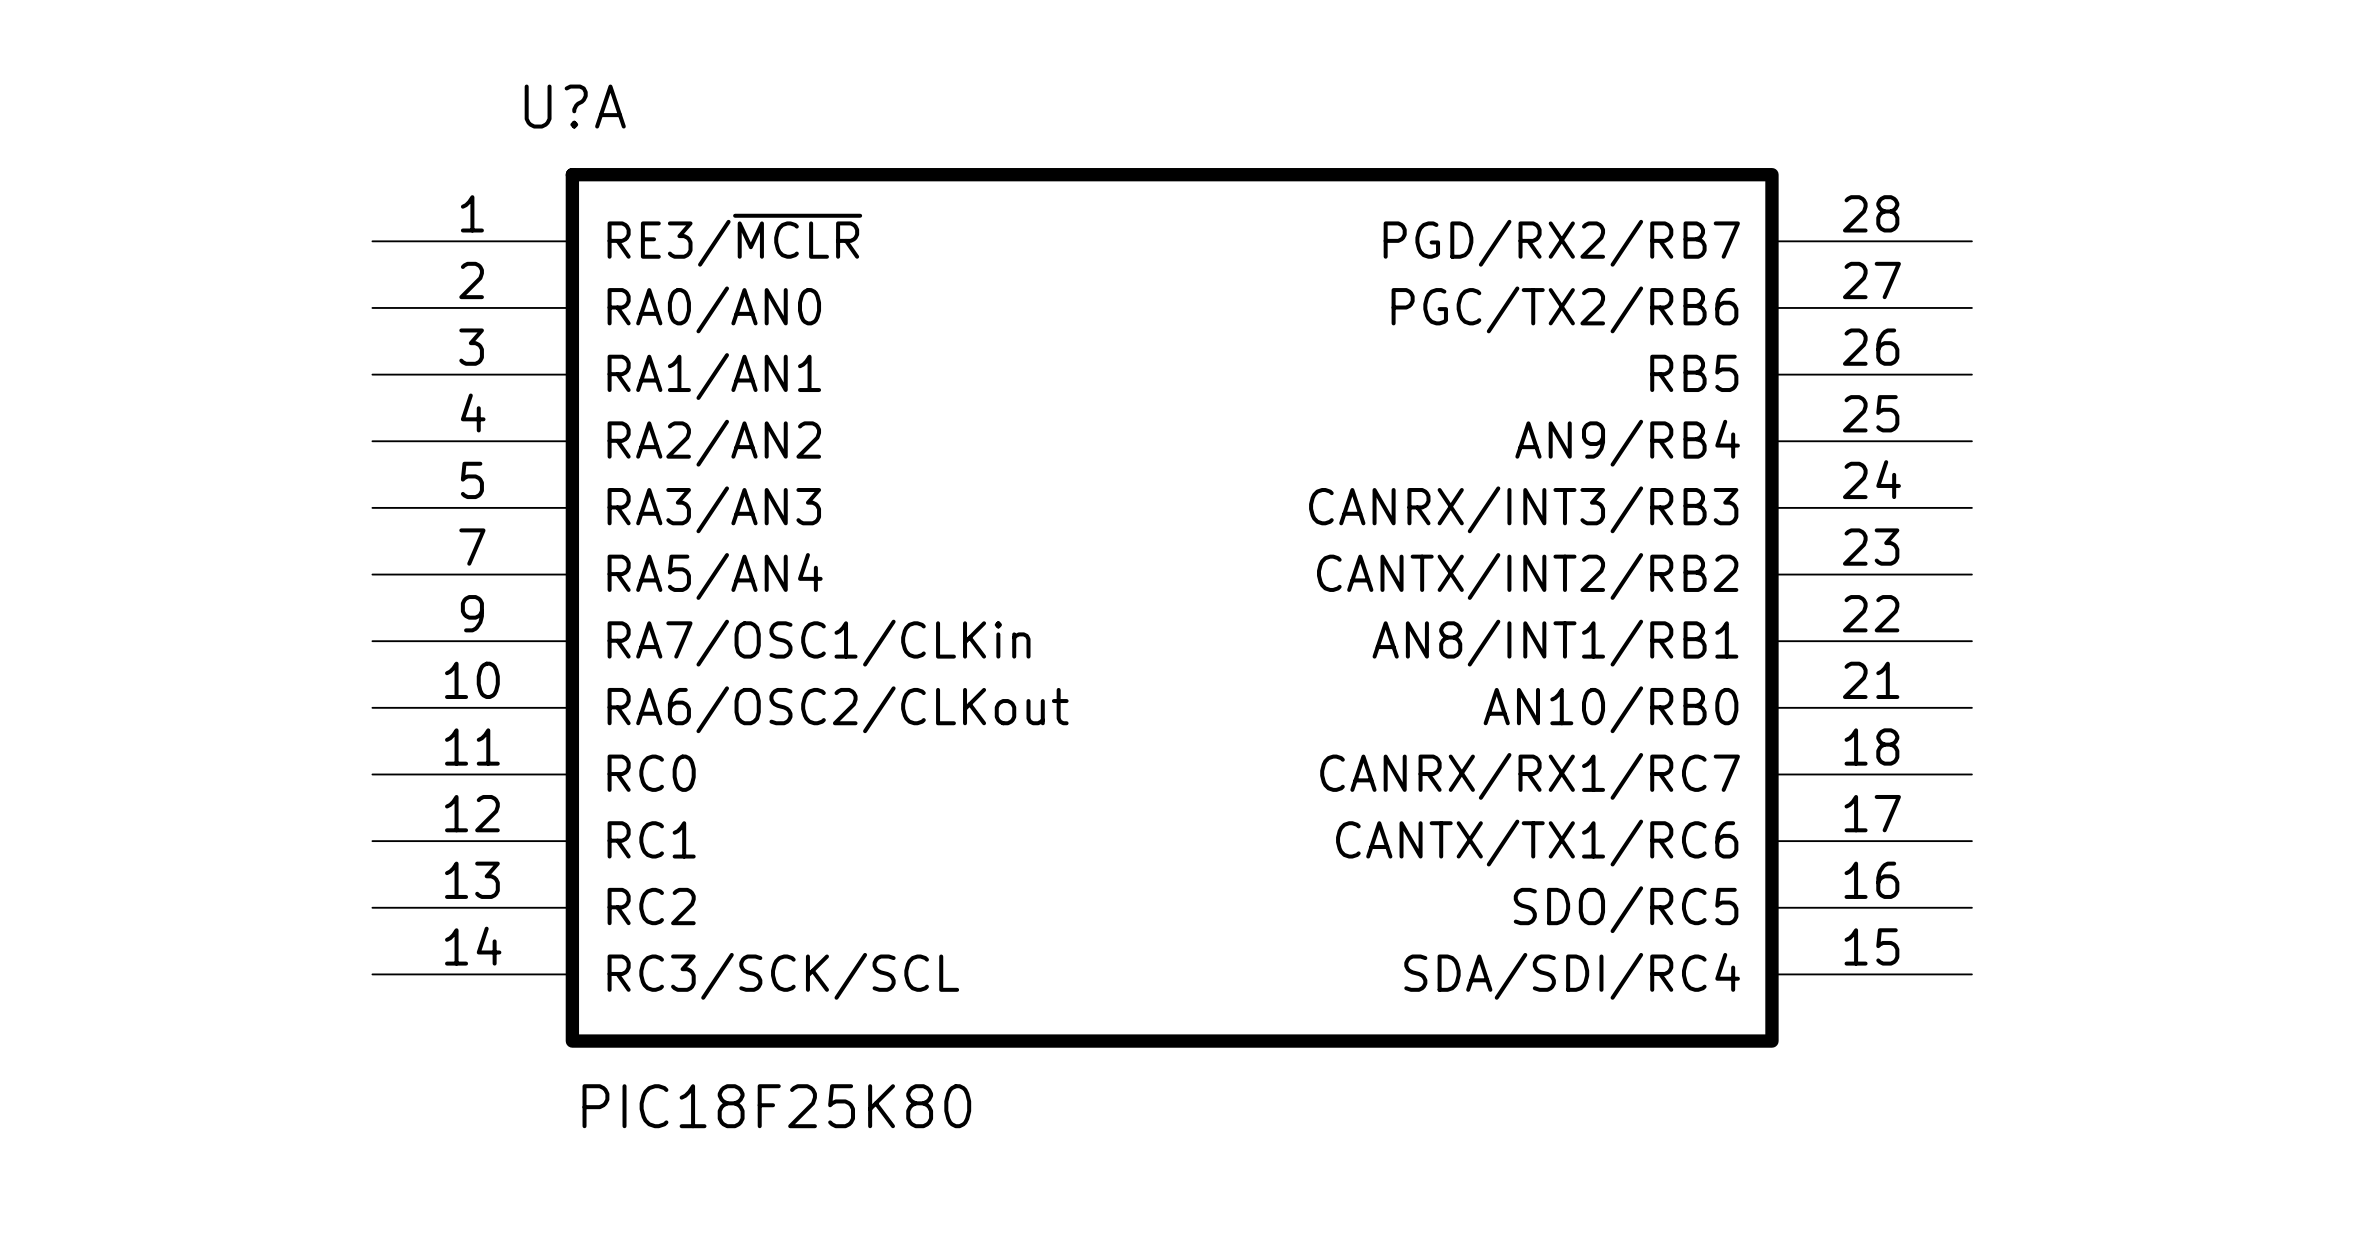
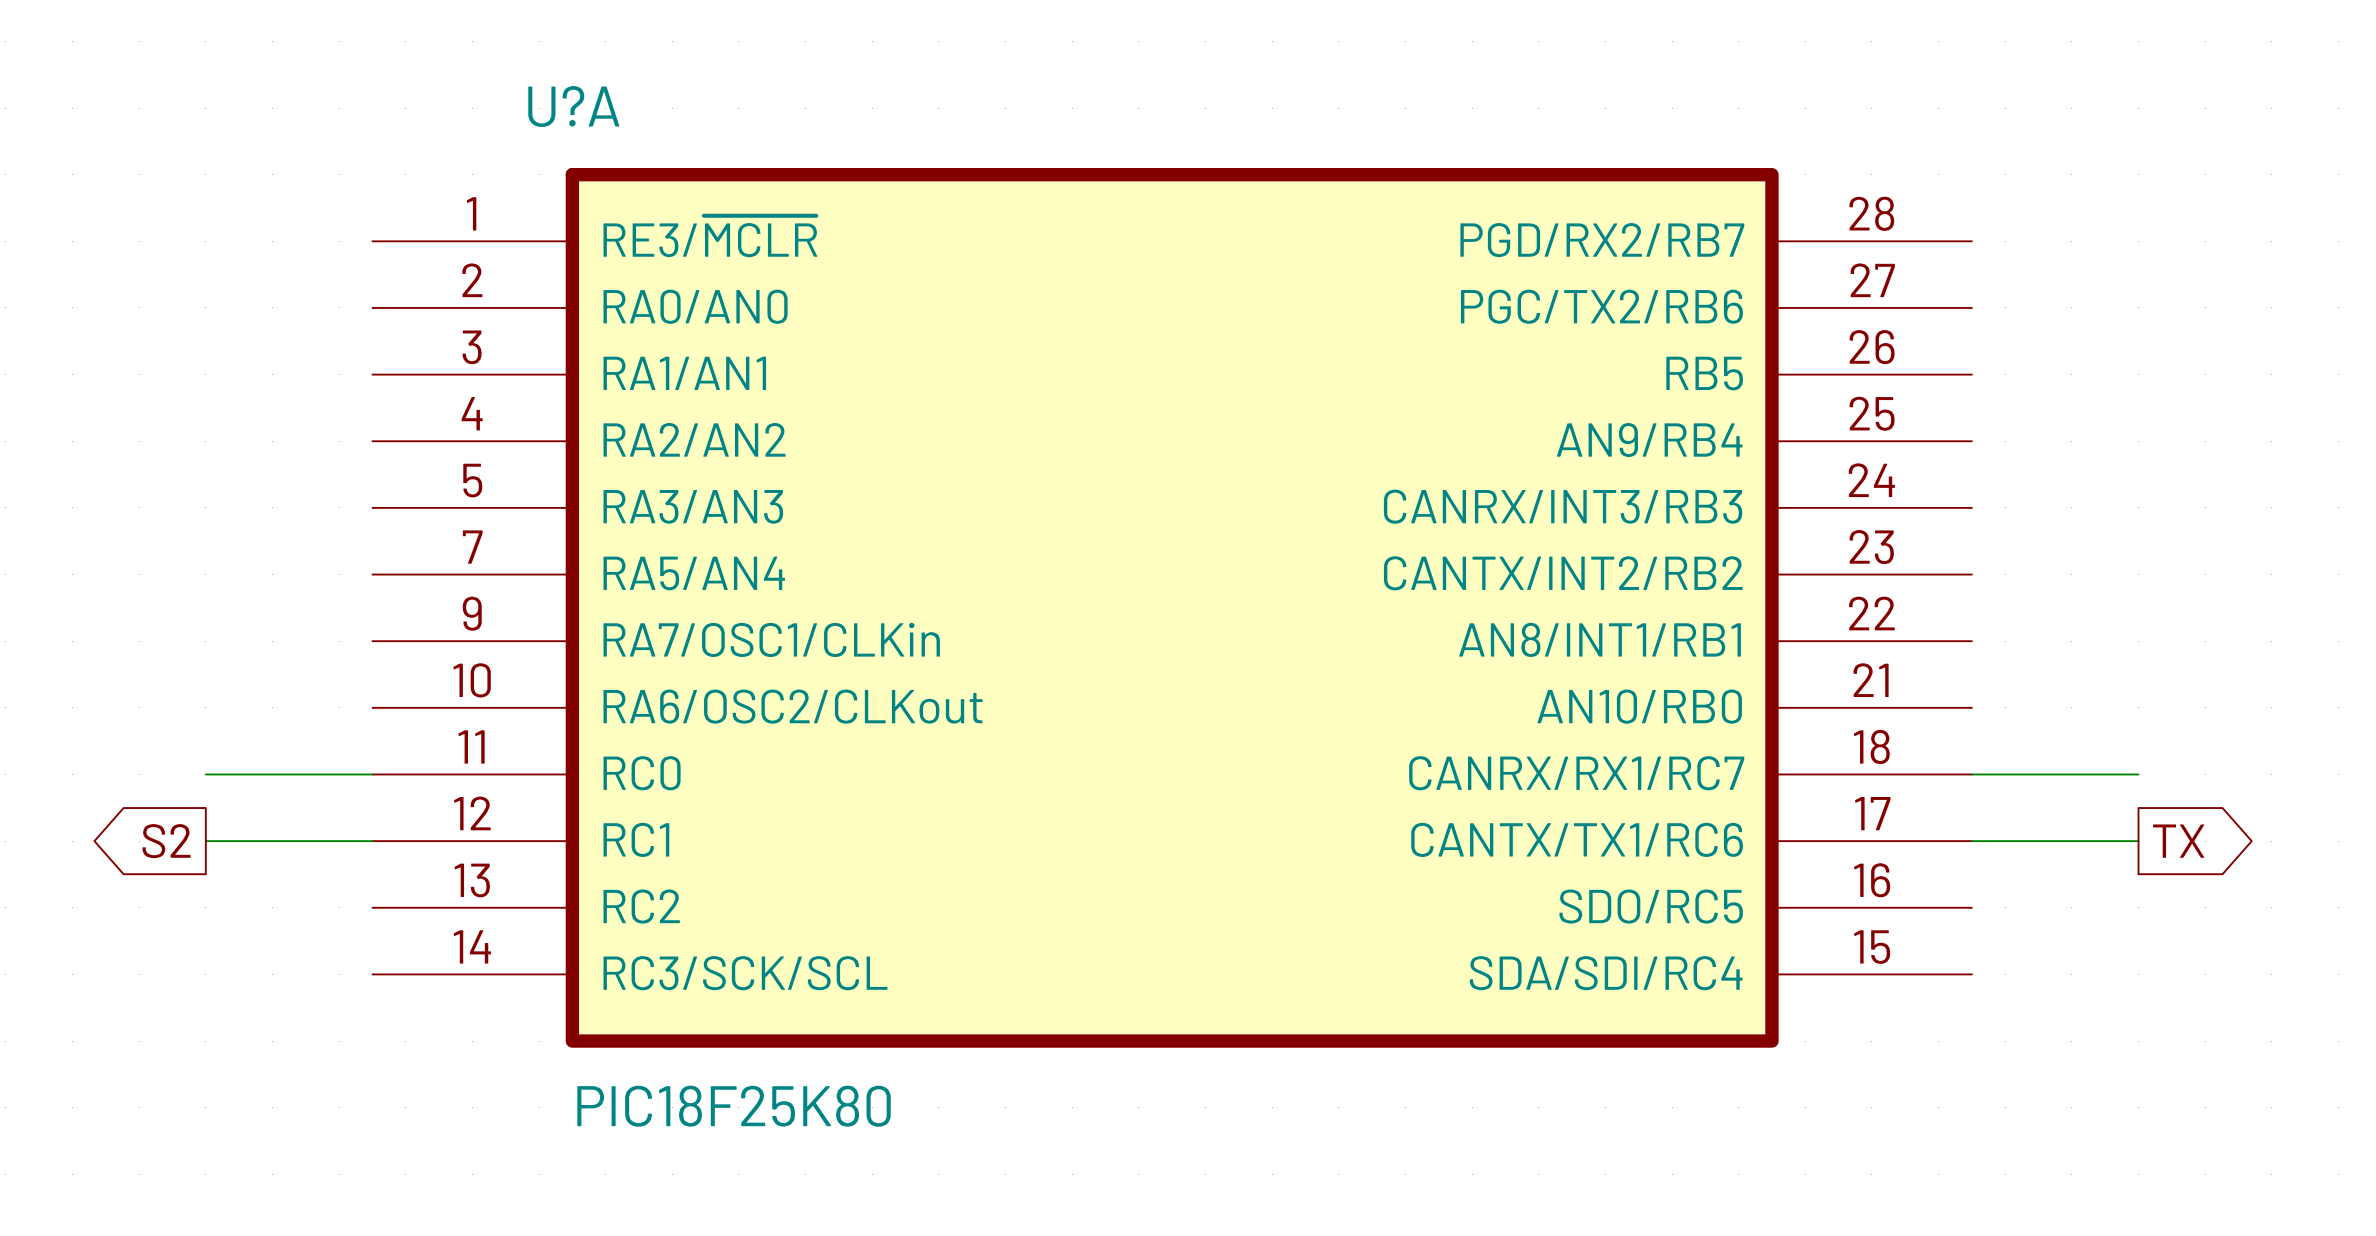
wire: none -> (205, 774) (372, 774)
wire: none -> (1971, 774) (2138, 774)
global label: none -> S2 (166, 841)
wire: none -> (205, 841) (372, 841)
wire: none -> (1971, 841) (2138, 841)
global label: none -> TX (2178, 841)

